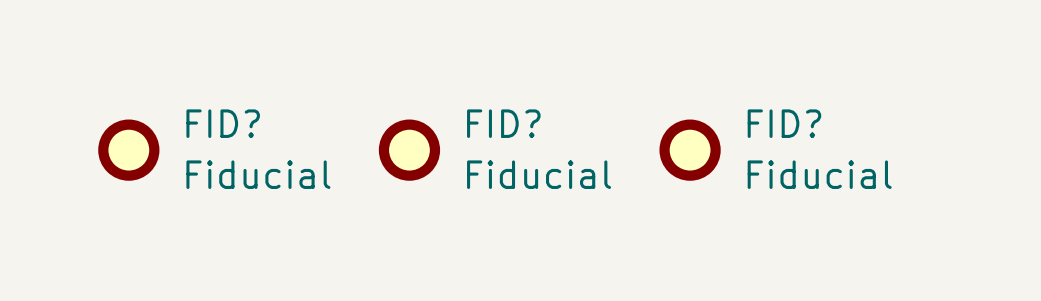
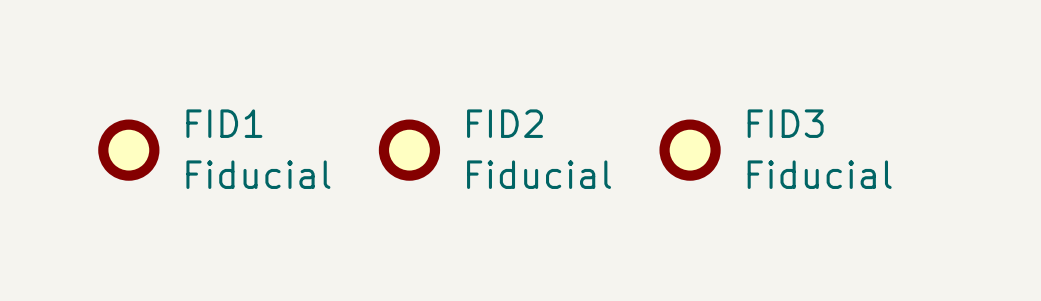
FID? name: FID? (223, 123) -> FID1 (224, 123)
FID? name: FID? (503, 123) -> FID2 (505, 123)
FID? name: FID? (784, 123) -> FID3 (785, 123)

